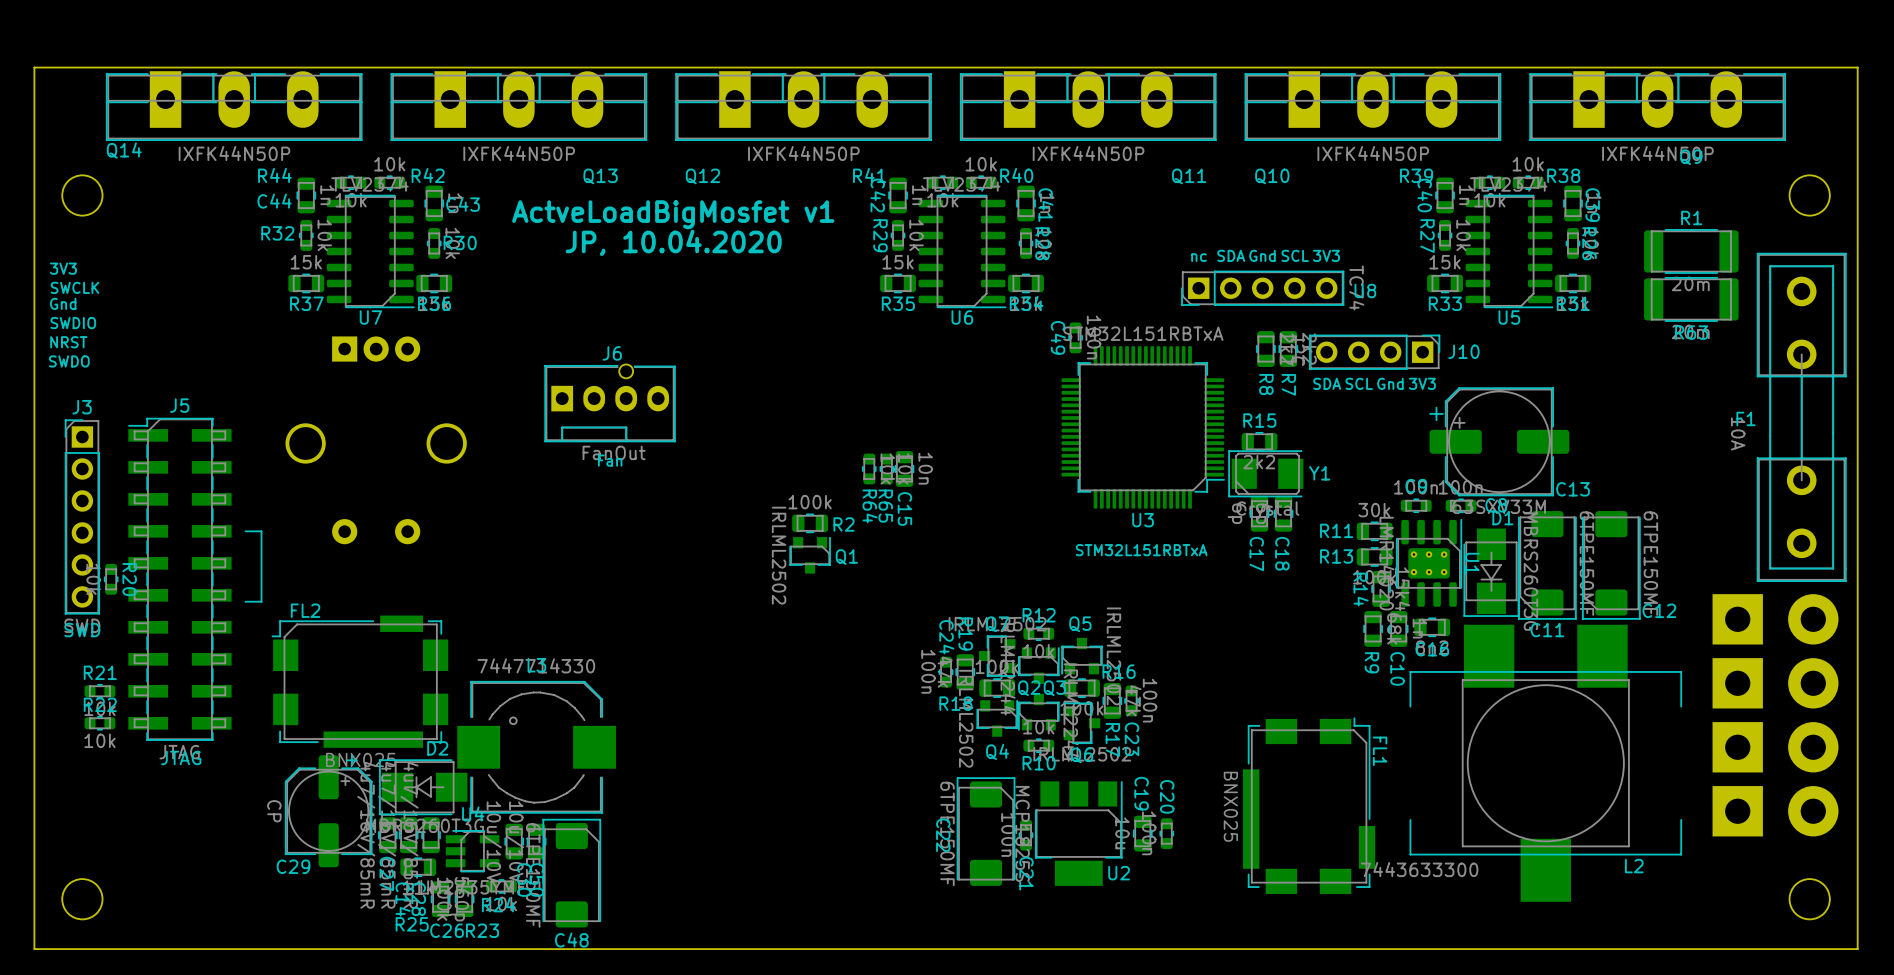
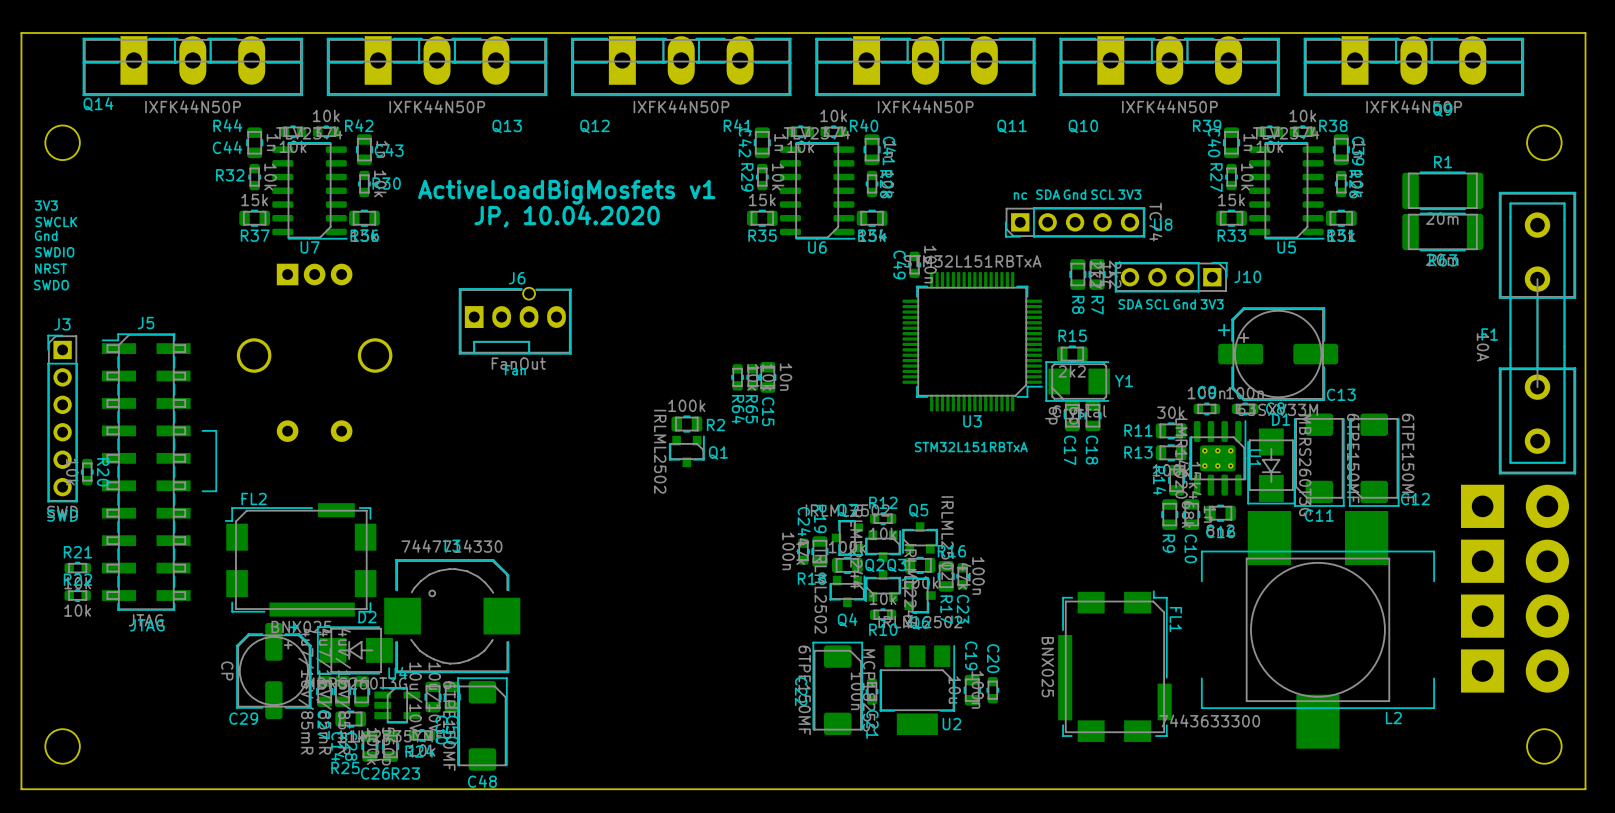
text: ActveLoadBigMosfet v1 (673, 214) -> none
text: JP, 10.04.2020 (673, 242) -> ActiveLoadBigMosfets v1 (566, 192)
text: none -> JP, 10.04.2020 (567, 216)

